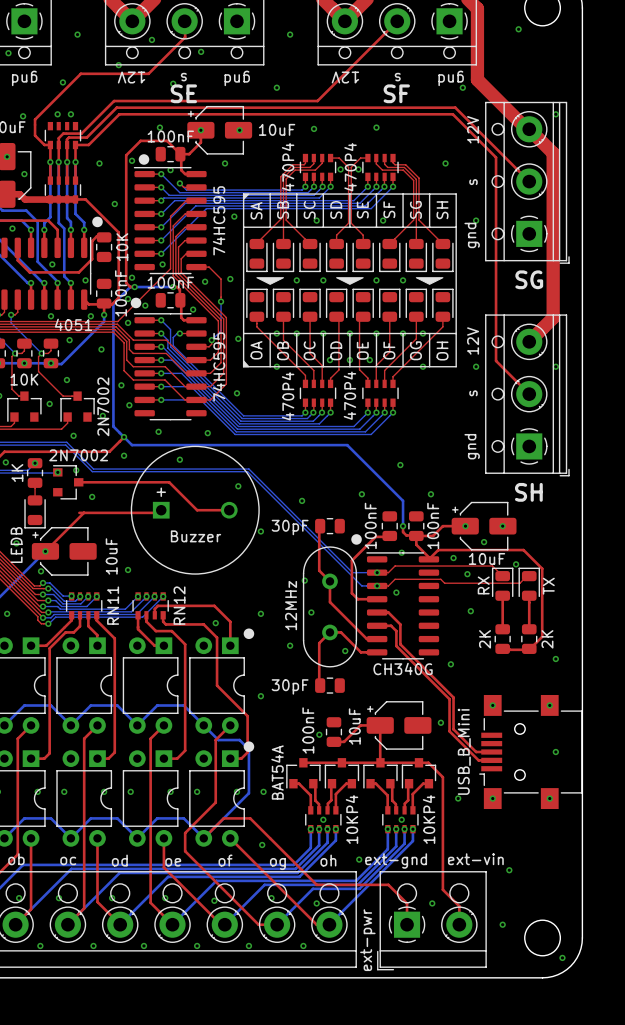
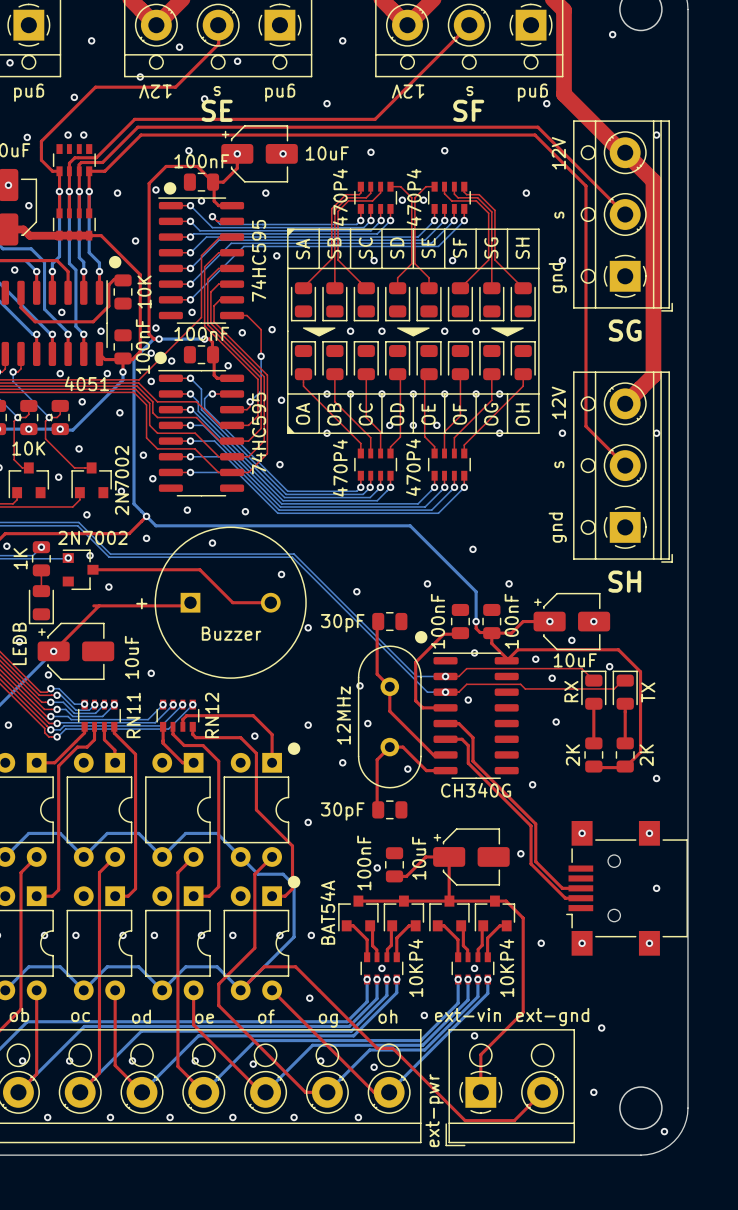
part text position: + (161, 492) -> + (141, 603)
part value: USB_B_Mini (464, 751) -> none
top track: (442, 856) (442, 889) (459, 906) (459, 924) -> (523, 1012) (480, 1054) (480, 1067)
text: ext-vin (475, 859) -> ext-gnd (552, 1017)
text: ext-gnd (396, 860) -> ext-vin (467, 1015)
top track: (316, 884) (388, 884) (407, 903) -> (374, 1045) (377, 1048) (392, 1048) (465, 1120) (514, 1120) (539, 1095)
via position: (432, 903) -> (474, 1035)

